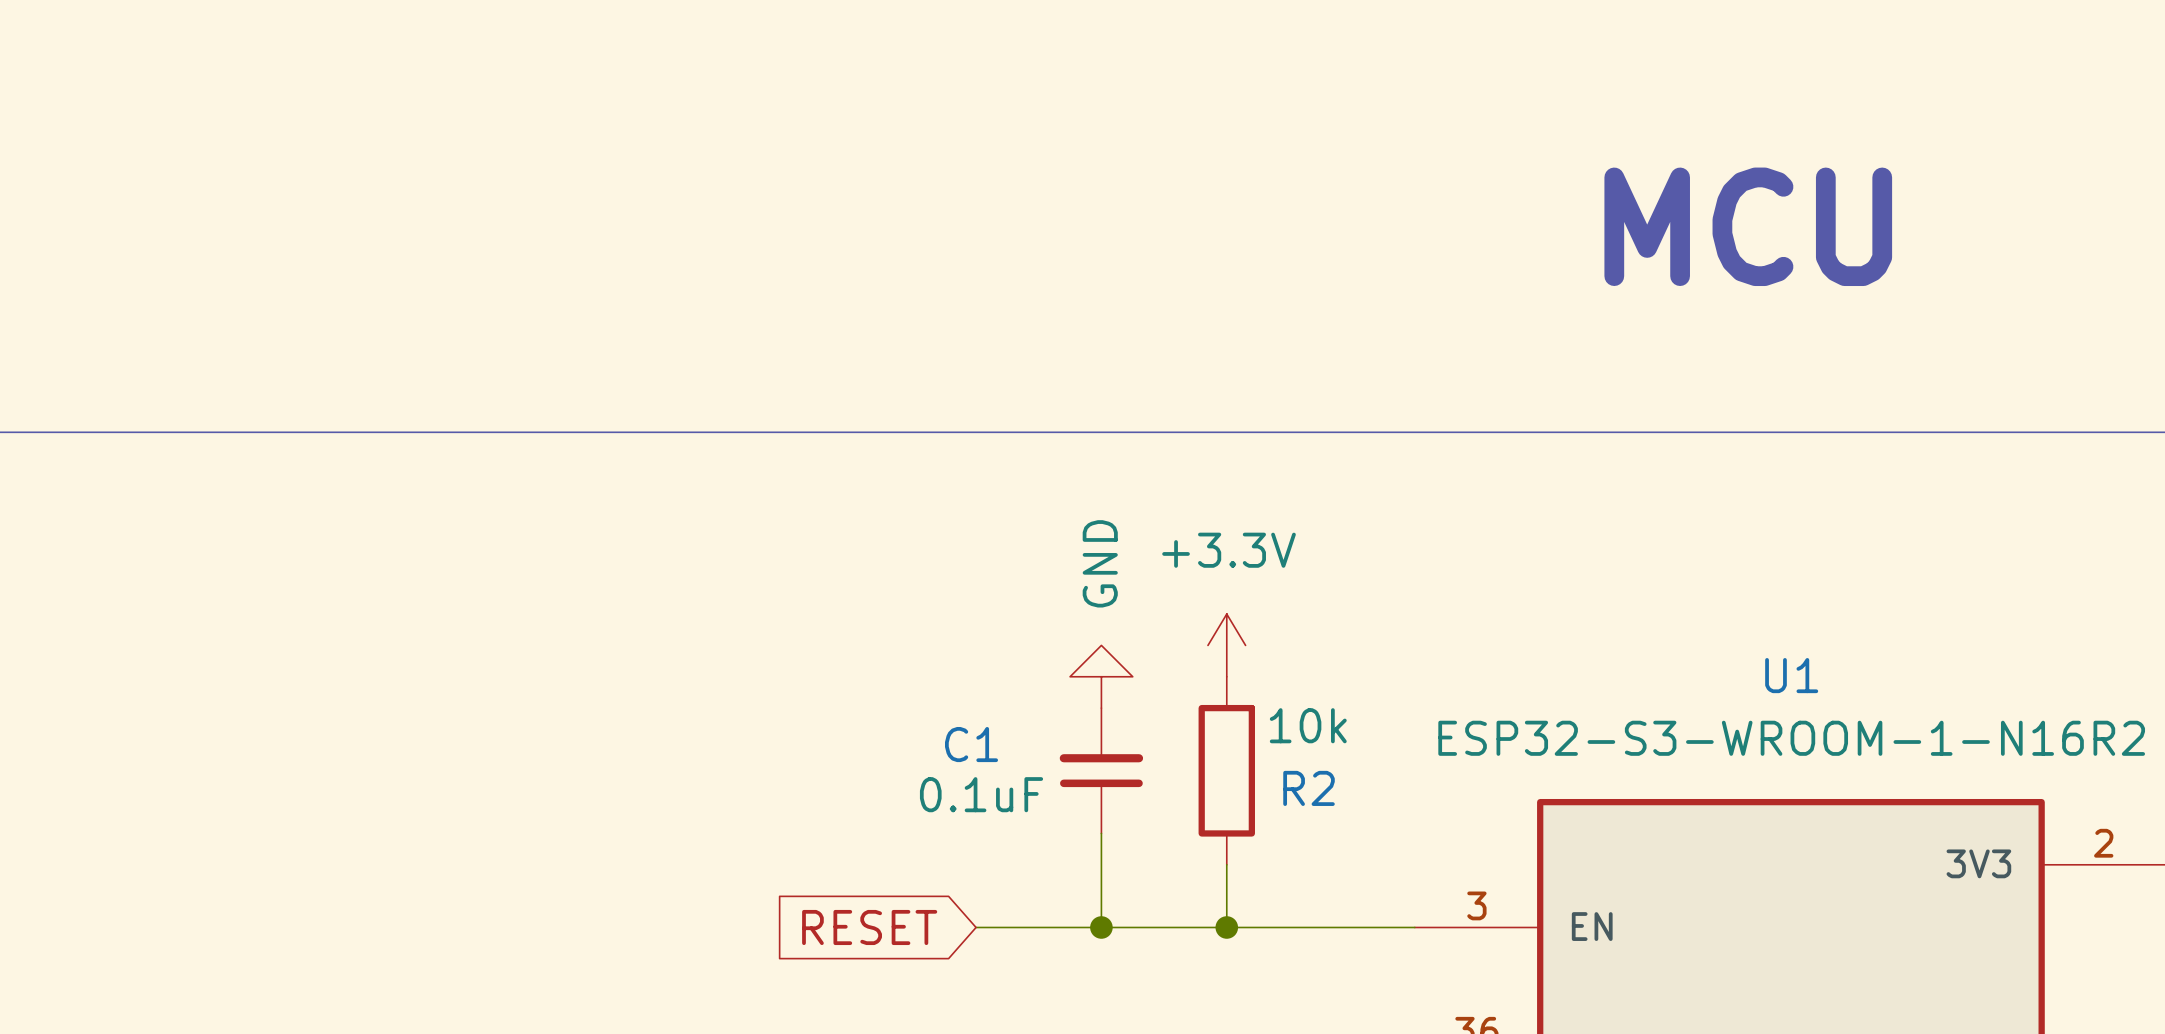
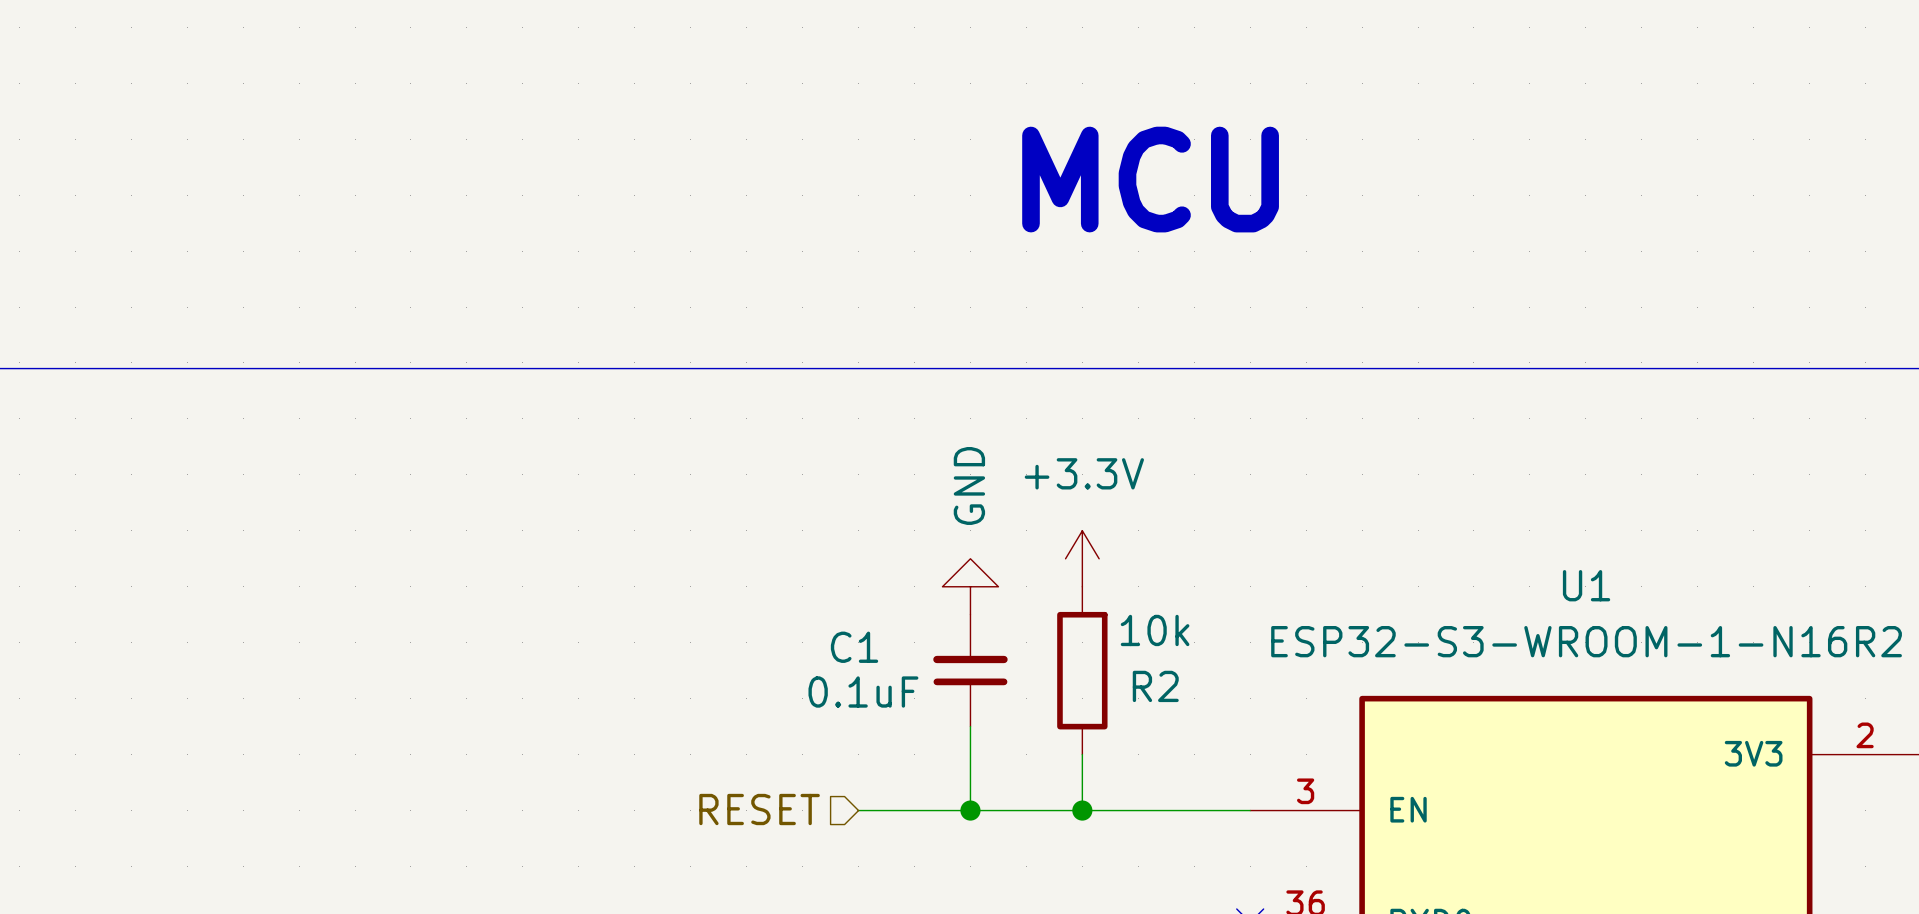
text position: MCU (1748, 226) -> MCU (1150, 179)
hierarchical label: none -> RESET (759, 809)
global label: RESET (869, 927) -> none

